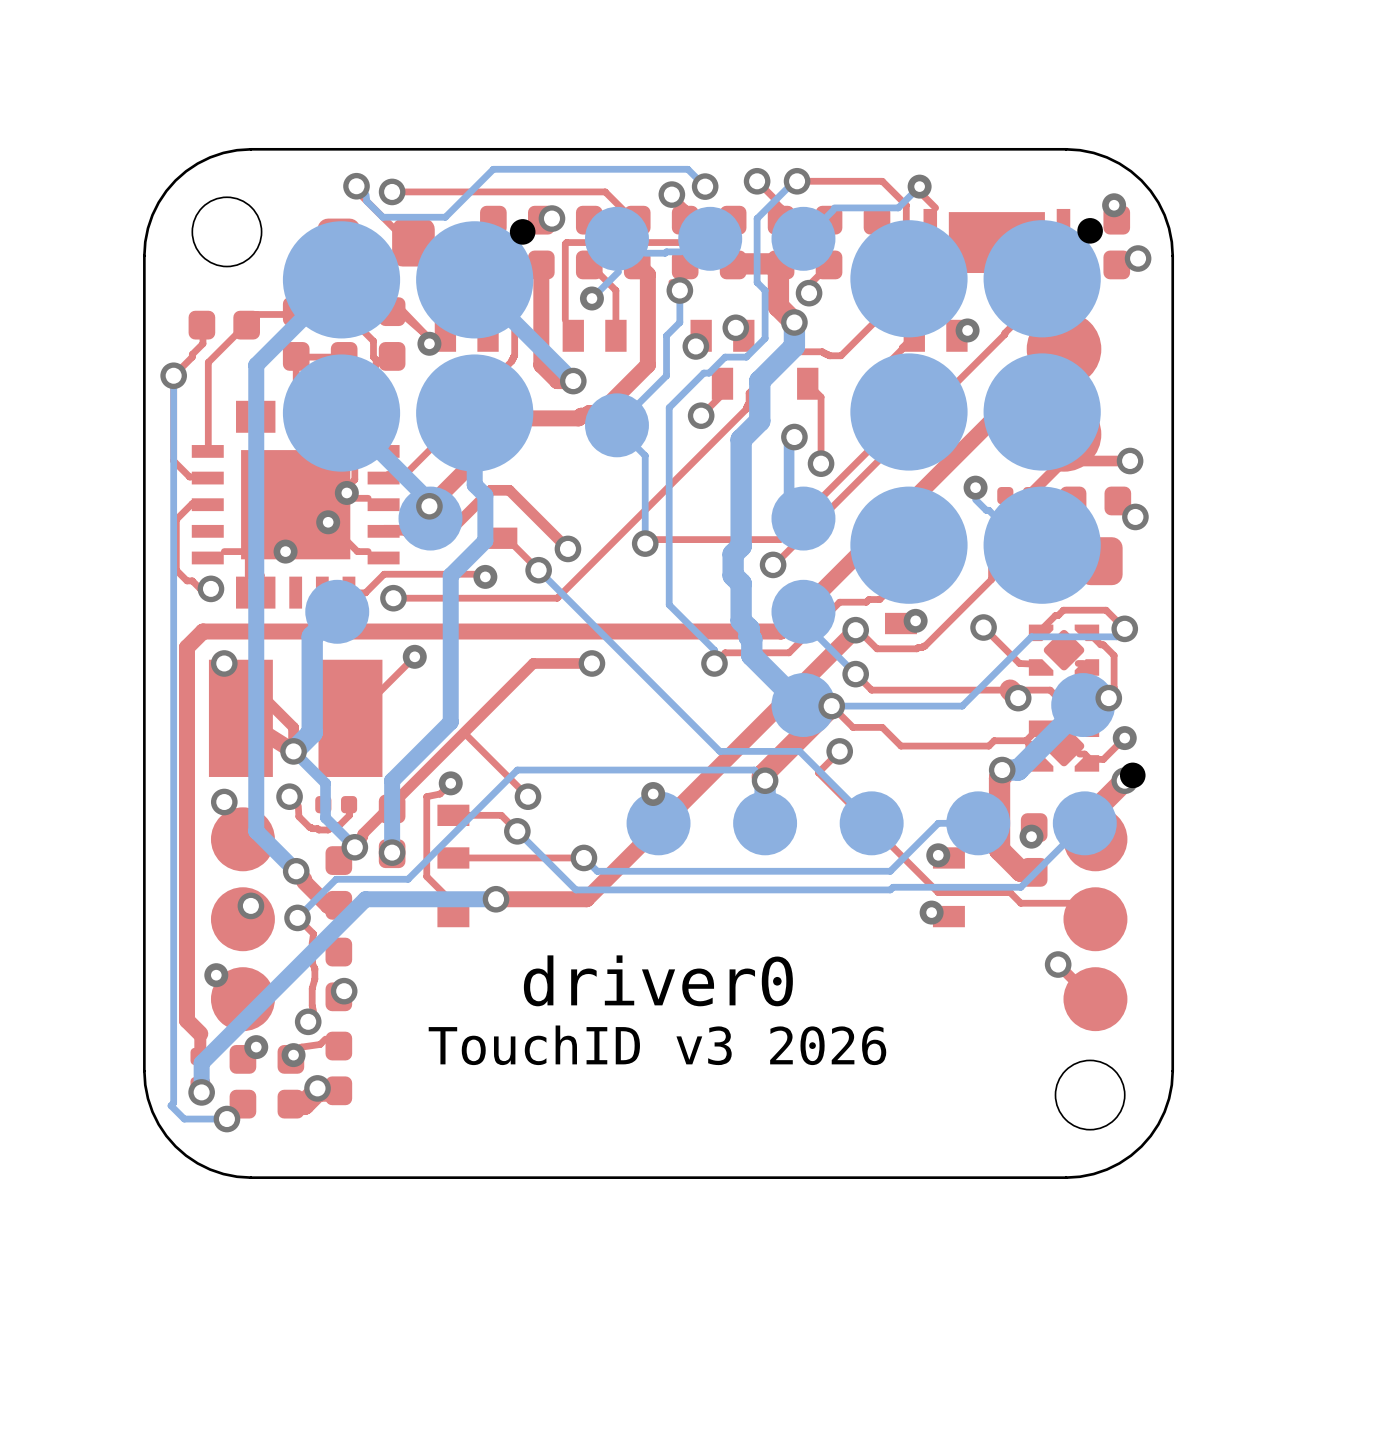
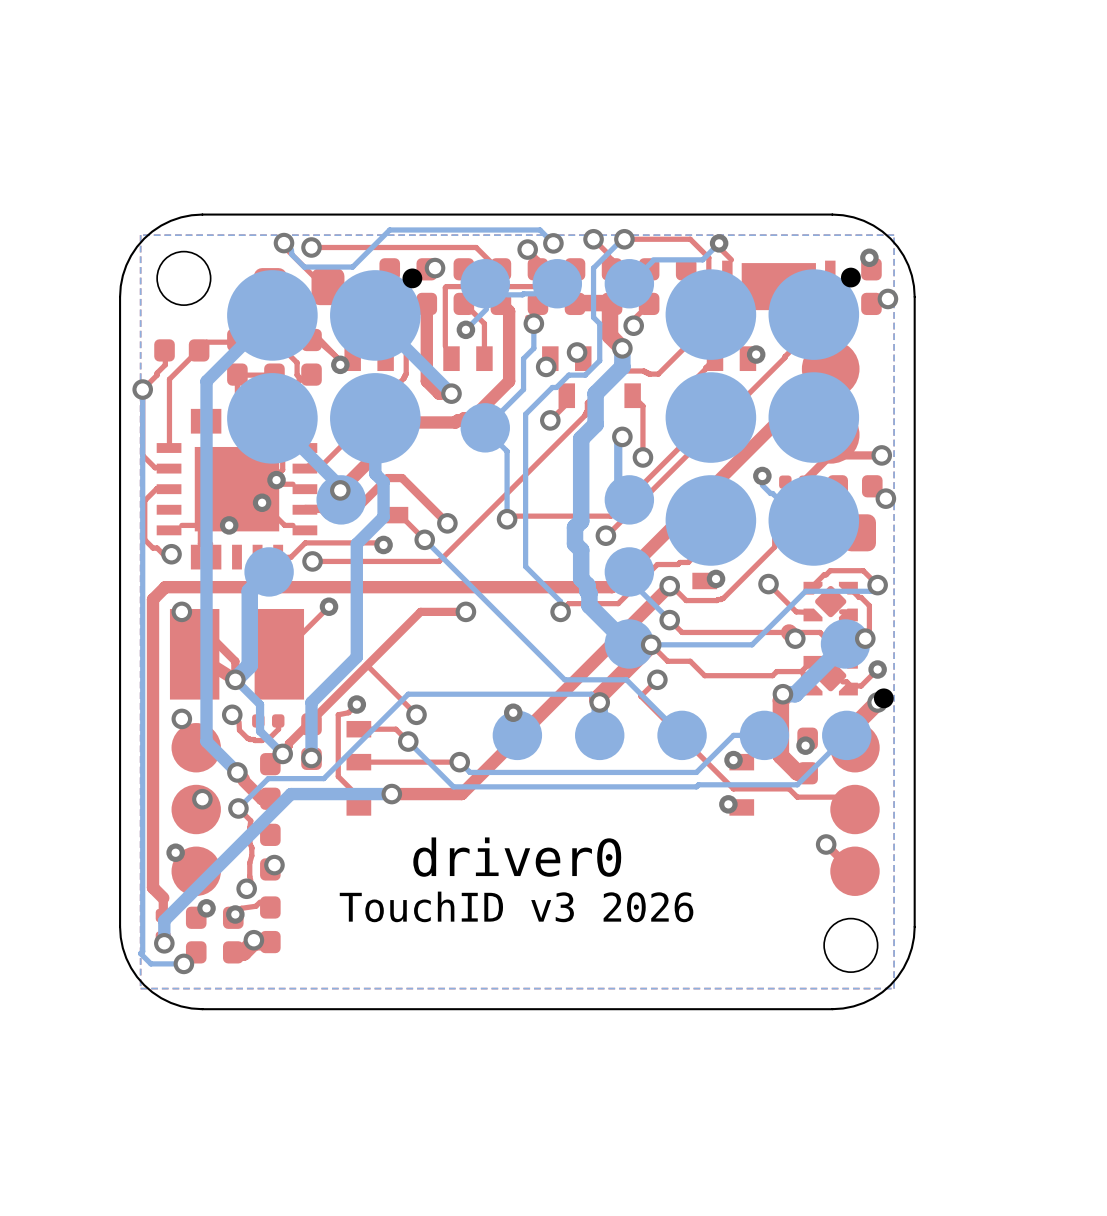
bottom zone outline: none -> (894, 235) (140, 235) (140, 988) (894, 988) (894, 235)

